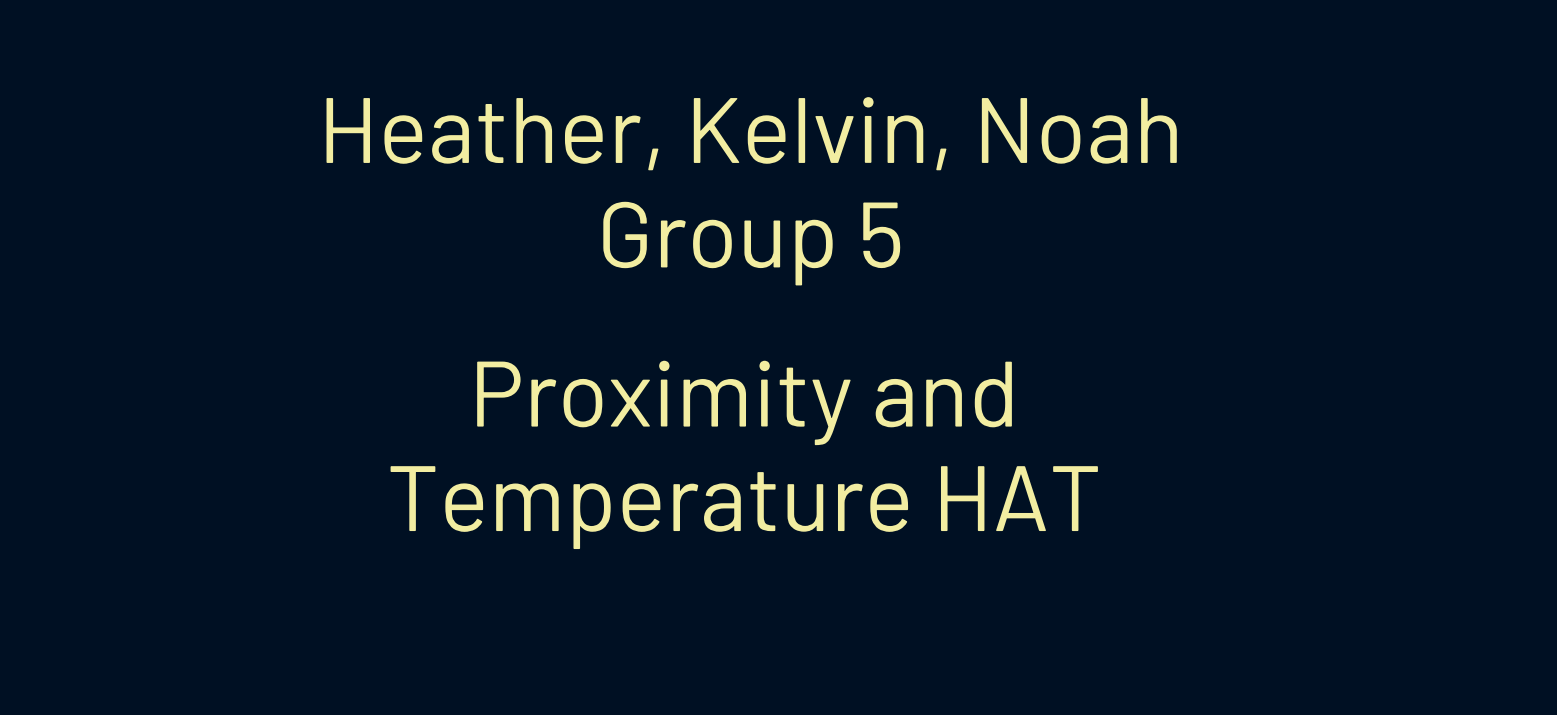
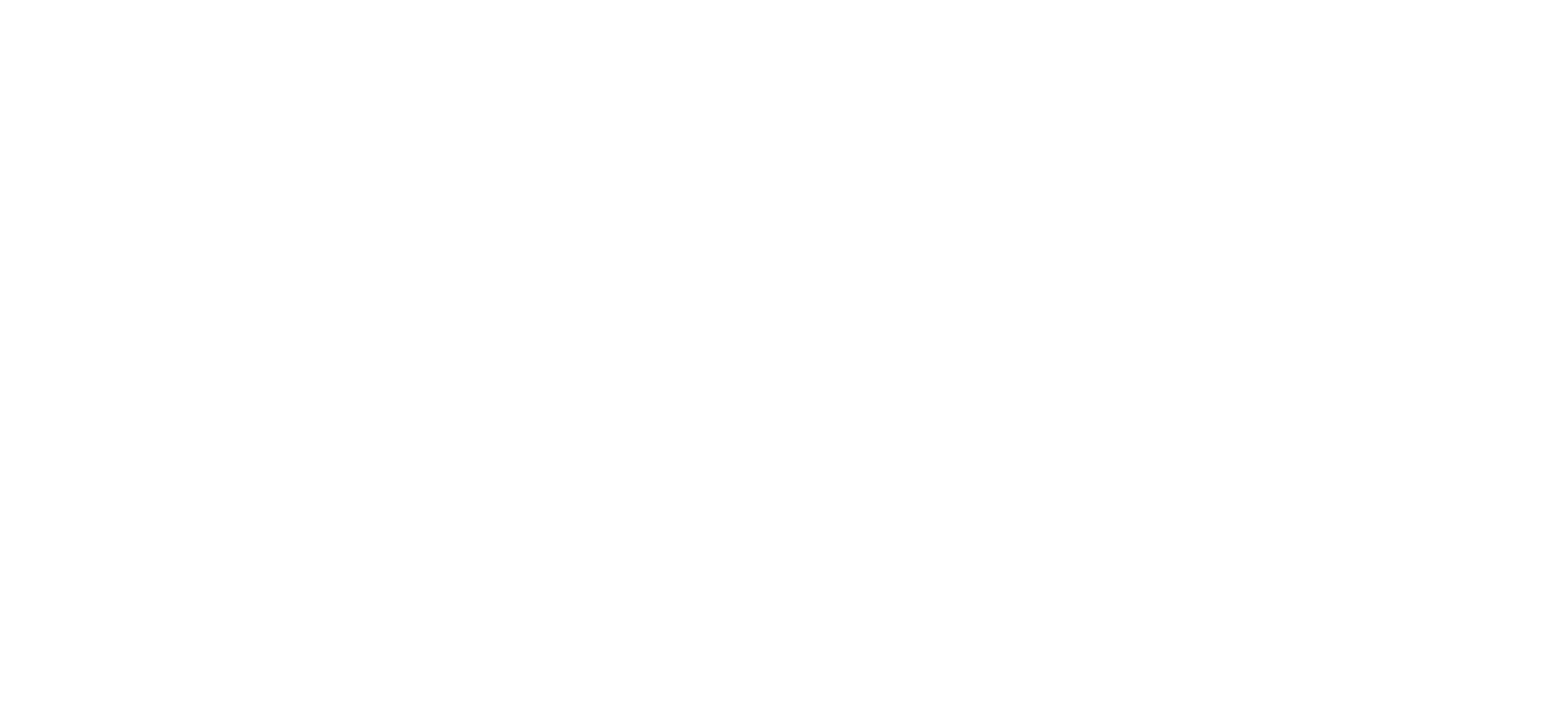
text: Heather, Kelvin, Noah (751, 133) -> none
text: Group 5 (751, 243) -> none
text: Proximity and (744, 402) -> none
text: Temperature HAT (744, 507) -> none

